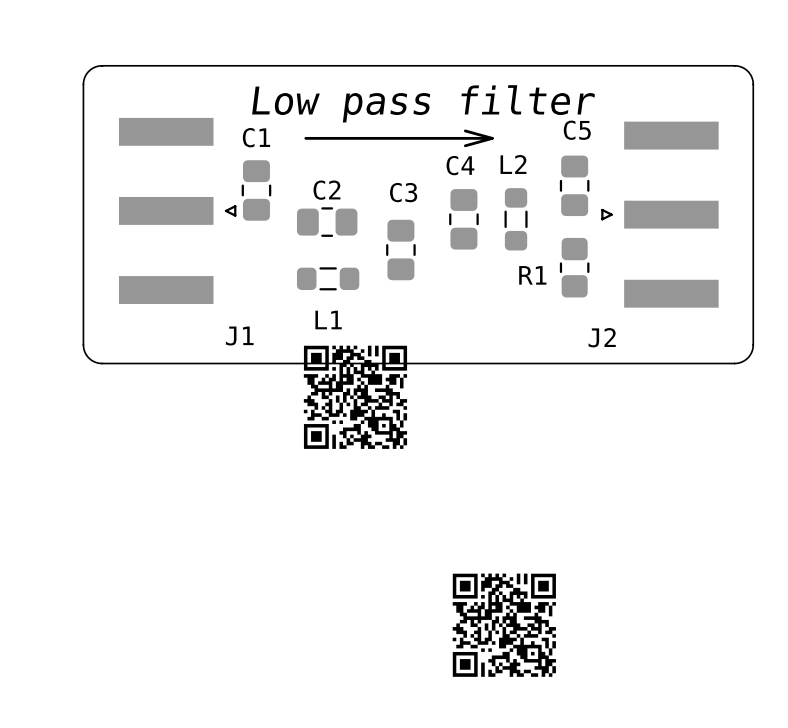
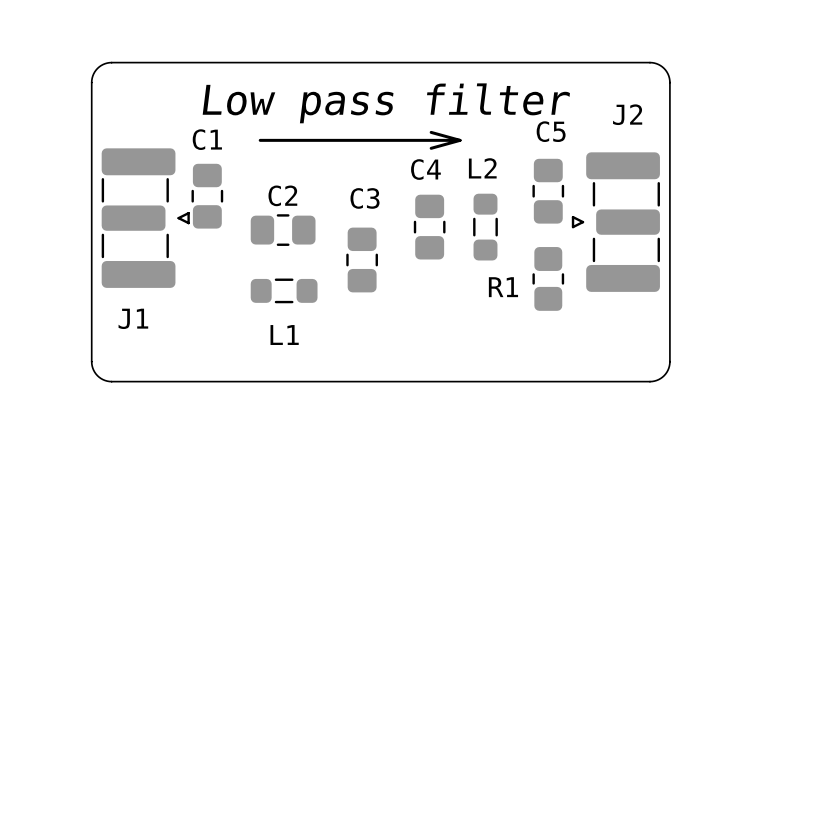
board edge: (167, 65) (97, 66) (87, 72) (83, 84) (84, 351) (90, 359) (99, 363) (167, 363) -> (111, 62) (97, 68) (91, 82) (91, 363) (97, 375) (111, 381)
board edge: (669, 65) (738, 66) (749, 72) (753, 84) (752, 351) (746, 359) (736, 363) (669, 363) -> (649, 62) (664, 68) (669, 82) (669, 363) (664, 375) (649, 381)
J1 footprint: [118, 117, 237, 304] -> [101, 148, 190, 288]
J2 footprint: [601, 121, 719, 308] -> [571, 152, 660, 292]
J1 name position: J1 (239, 336) -> J1 (133, 318)
J2 name position: J2 (602, 337) -> J2 (627, 114)
drawing: [303, 345, 408, 449] -> none
drawing: [452, 573, 556, 677] -> none

